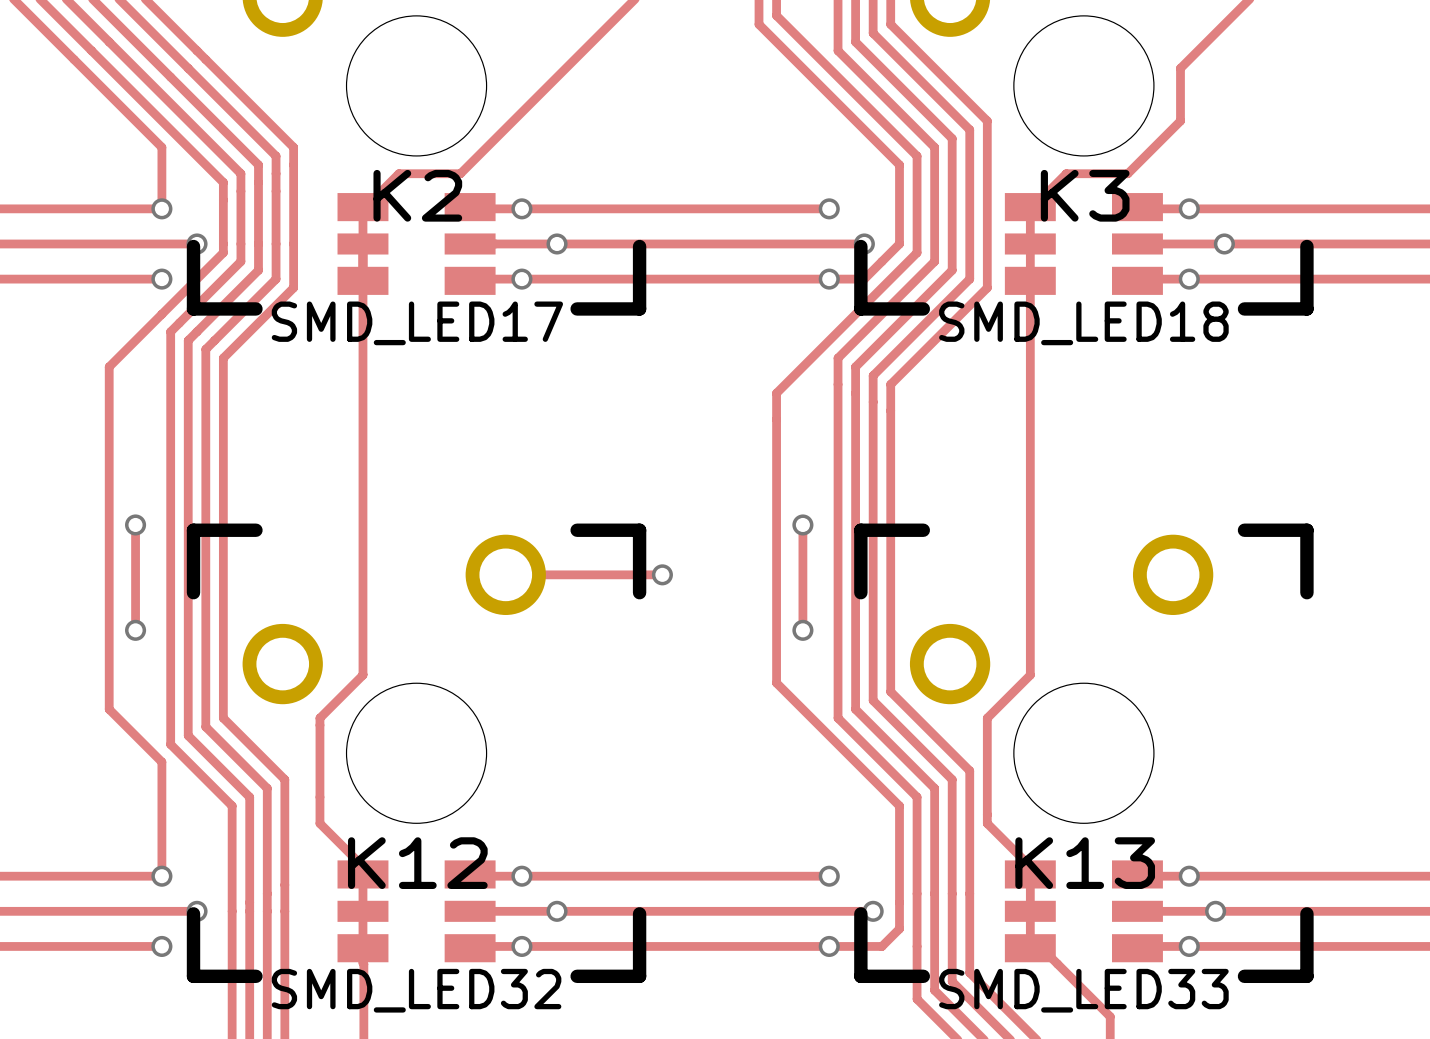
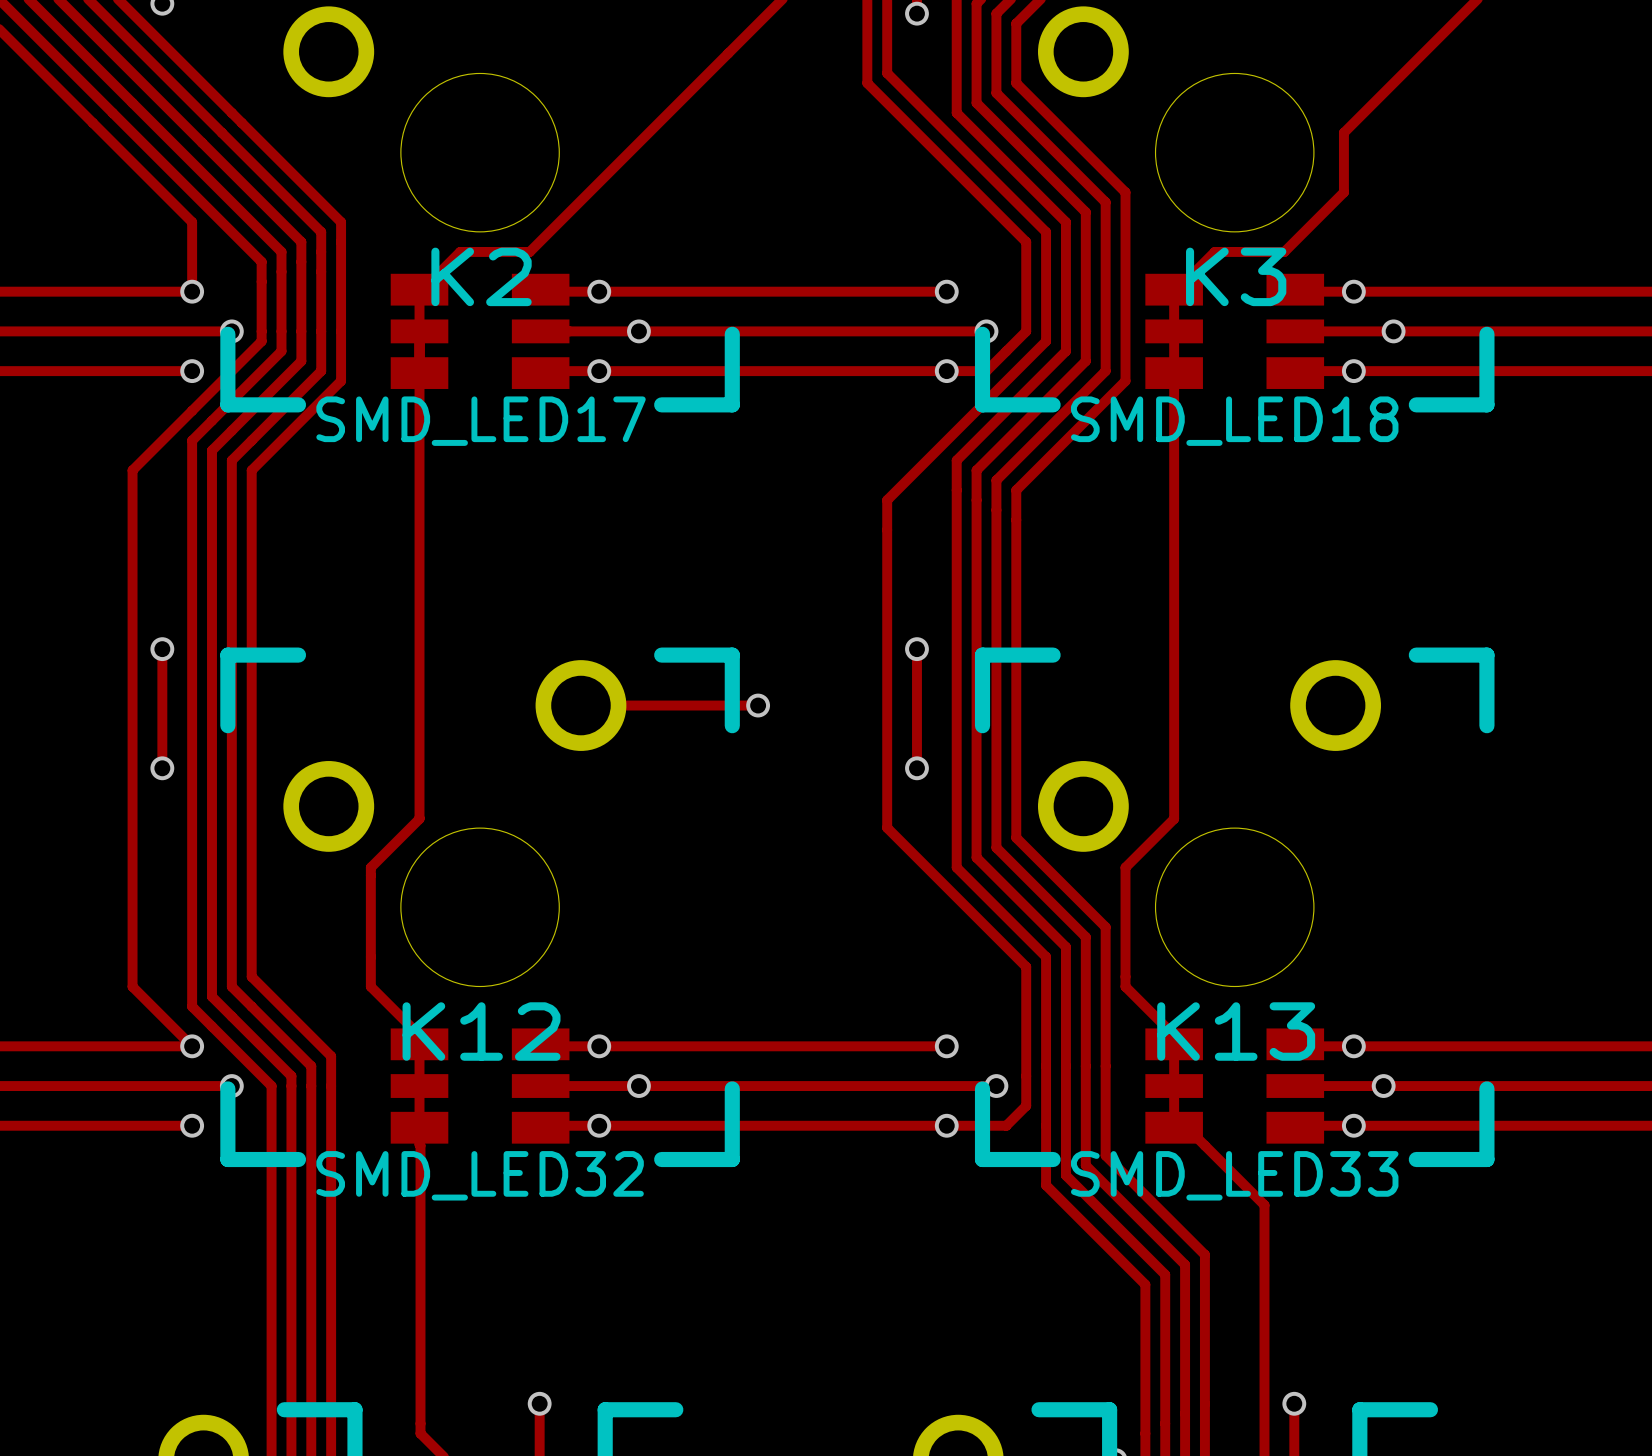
track: (170, 331) (170, 744) (232, 805) (232, 911) -> (202, 430) (192, 440) (192, 917)
track: (188, 340) (188, 735) (249, 797) (249, 902) -> (221, 440) (211, 450) (211, 996) (291, 1076)
track: (205, 349) (205, 726) (267, 788) (267, 893) -> (241, 450) (231, 460) (231, 986) (311, 1066)
track: (223, 358) (223, 718) (284, 779) (284, 884) -> (261, 460) (251, 470) (251, 976) (331, 1056)
track: (109, 709) (161, 762) -> (132, 857) (132, 986) (192, 1046)
track: (161, 841) (161, 876) -> (192, 1006) (271, 1086)

